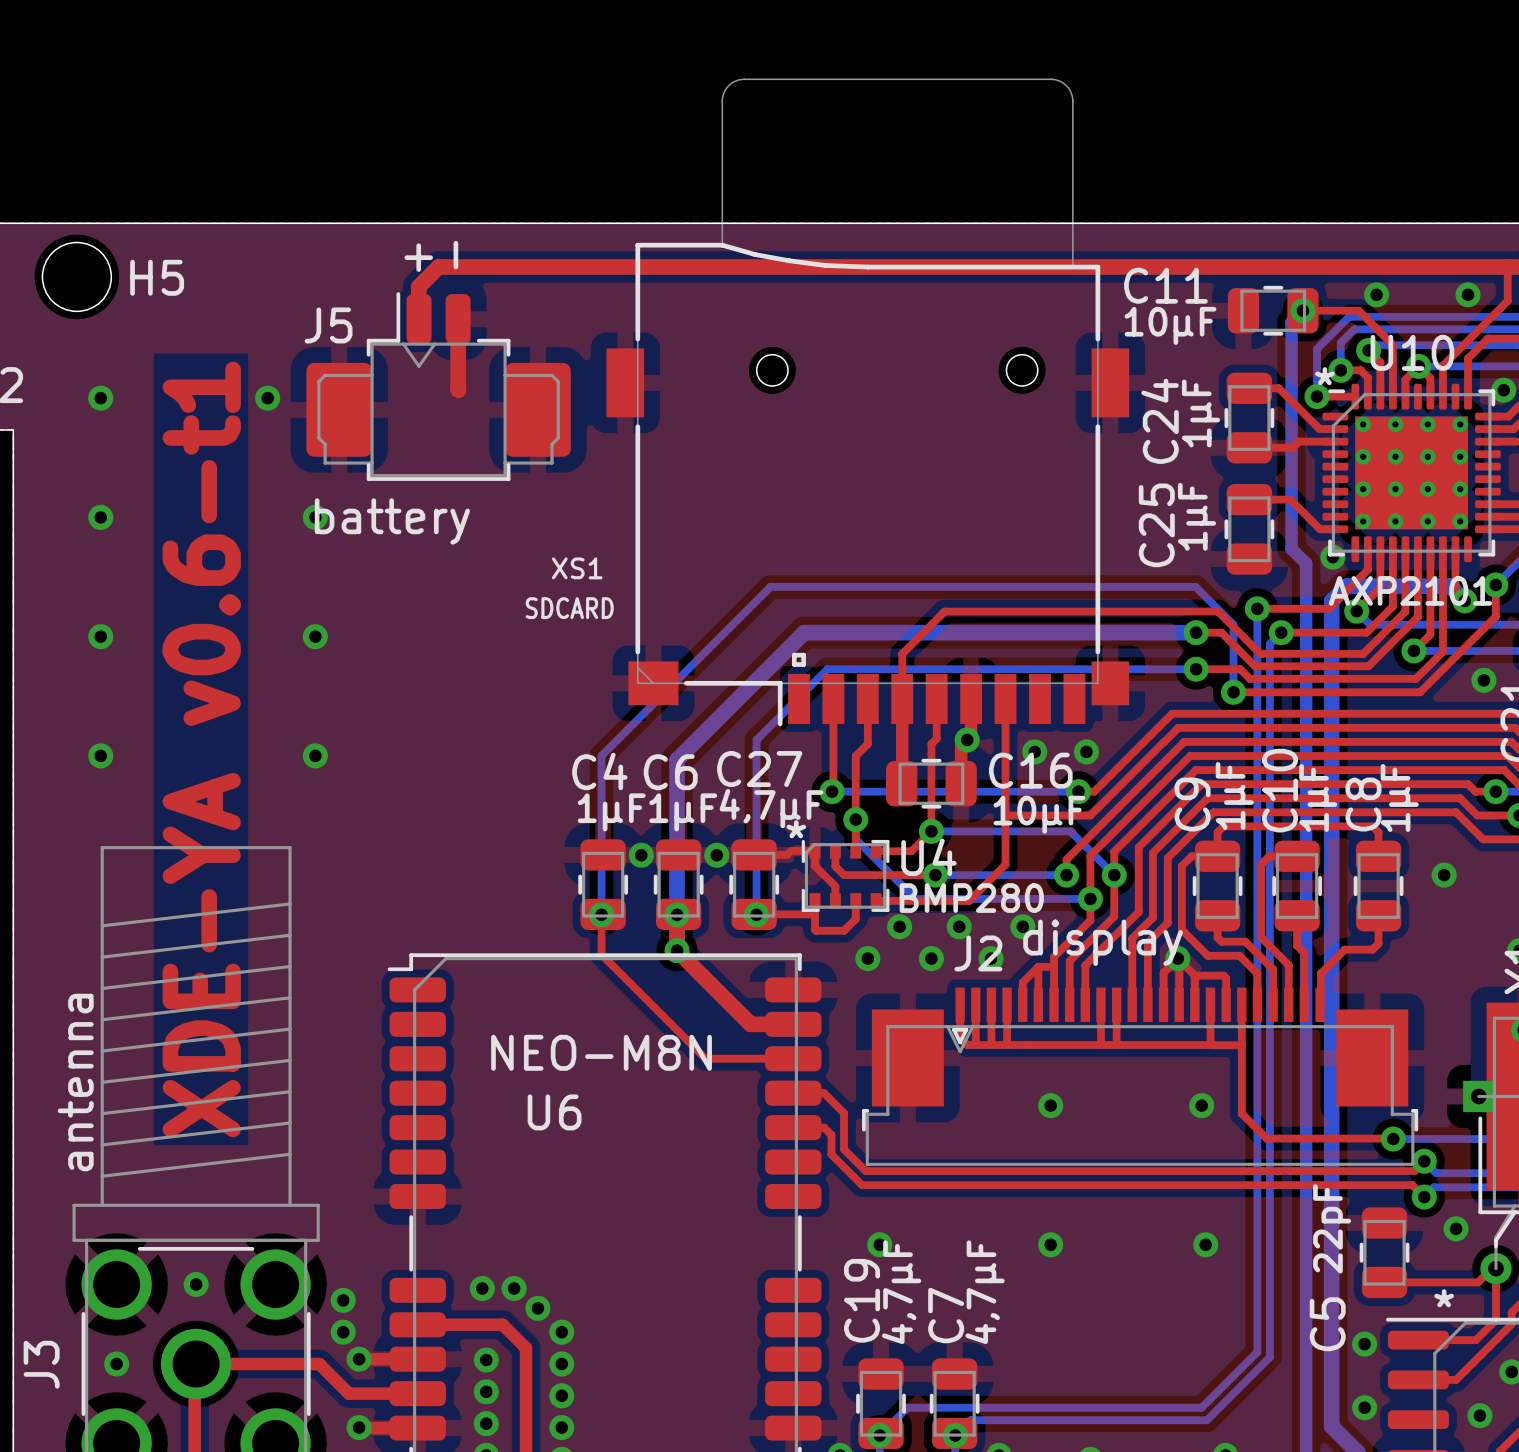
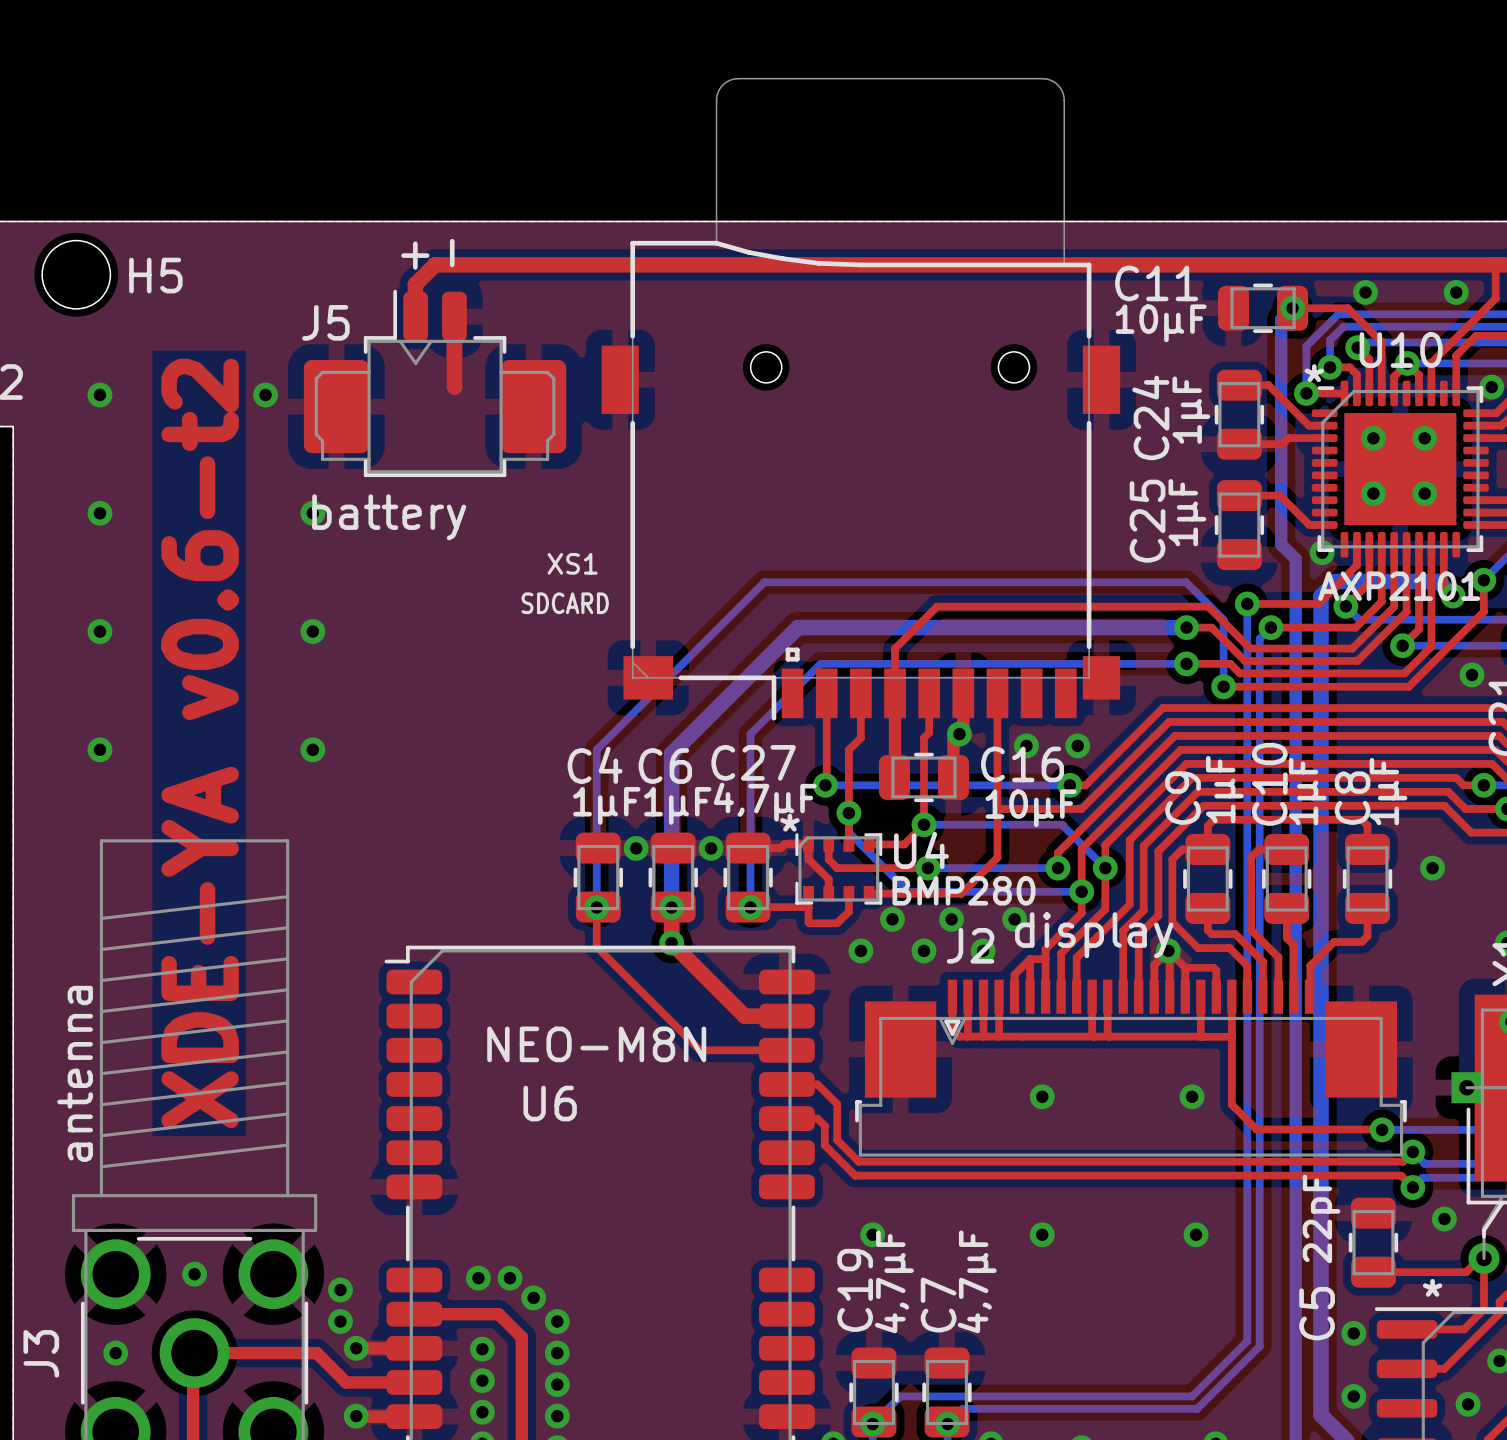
U10 footprint: [1322, 383, 1501, 563] -> [1311, 380, 1489, 558]
via: none -> (1373, 438)
via: none -> (1424, 438)
via: none -> (1373, 493)
via: none -> (1424, 493)
text: XDE-YA v0.6-t1 (201, 749) -> XDE-YA v0.6-t2 (200, 743)

